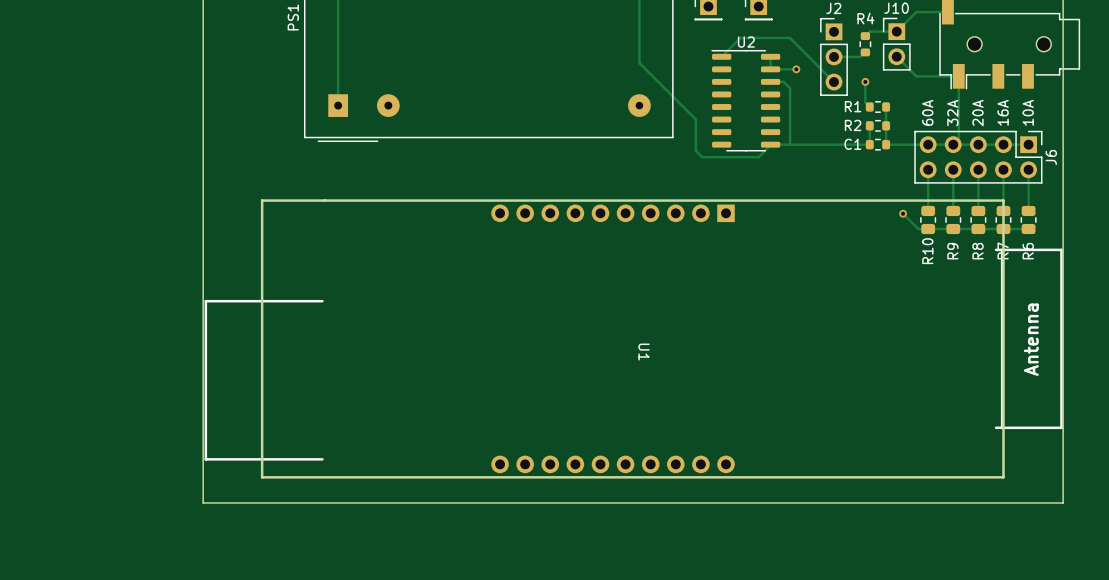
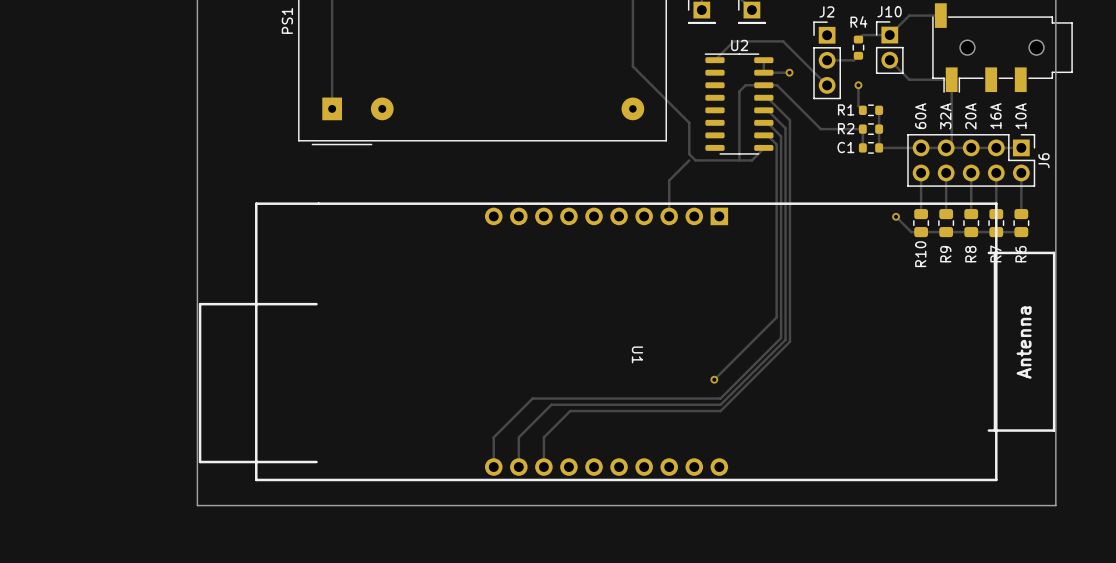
track: none -> (763, 85) (745, 85) (739, 91) (739, 160)
track: (790, 88) (790, 144) -> (783, 91) (820, 129) (862, 129)
track: none -> (763, 97) (767, 97) (789, 120) (789, 341) (720, 411) (570, 411) (543, 437) (543, 467)
track: none -> (763, 110) (767, 110) (785, 128) (785, 339) (720, 404) (551, 404) (518, 437) (518, 467)
track: none -> (763, 122) (767, 122) (781, 136) (781, 338) (720, 398) (532, 398) (493, 437) (493, 467)
track: none -> (763, 135) (767, 135) (776, 144) (776, 317) (714, 379)
track: (770, 144) (869, 144) -> none
track: none -> (689, 160) (669, 180) (669, 216)
U1 footprint: [204, 199, 1063, 479] -> [198, 202, 1056, 482]
via: none -> (714, 379)

